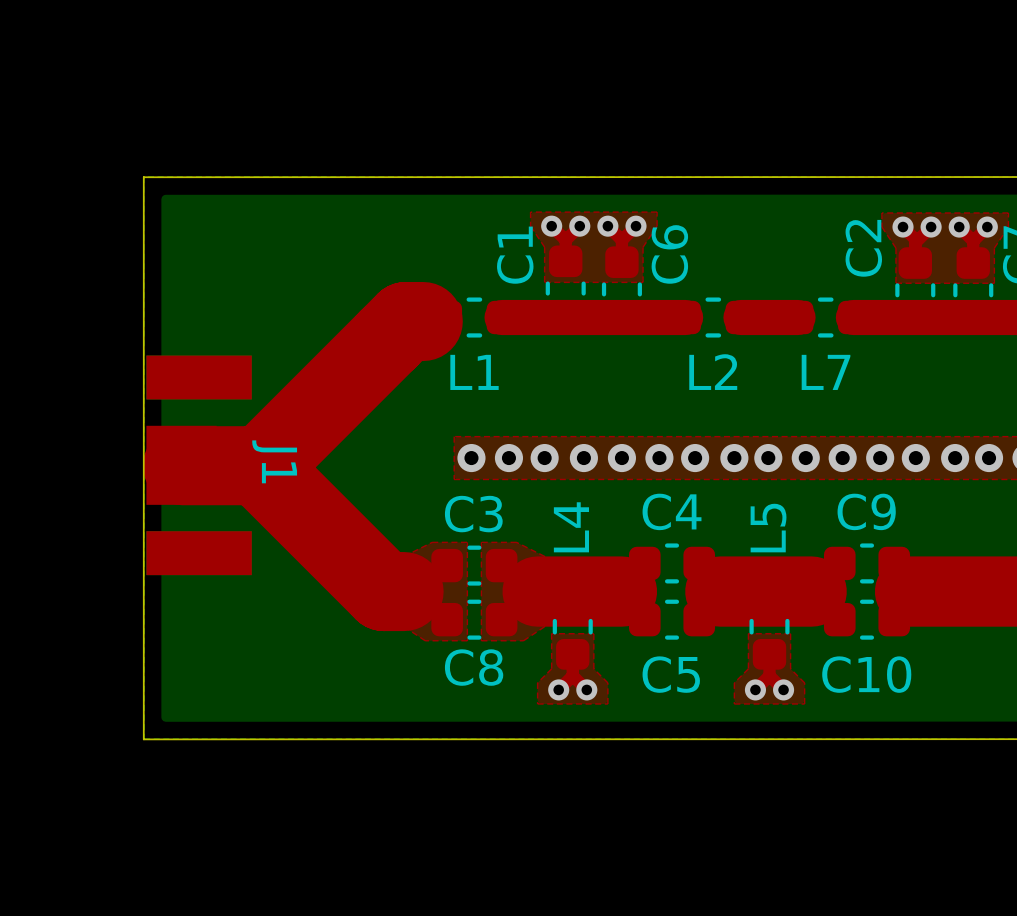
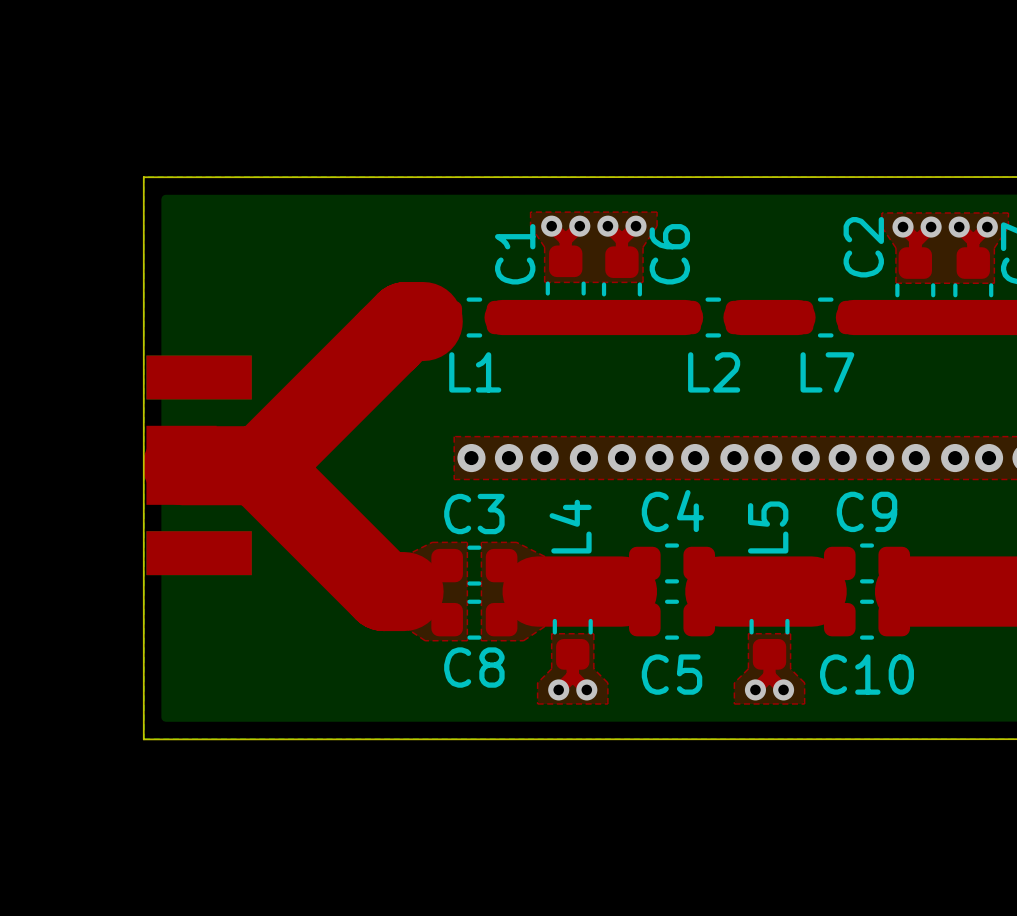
J1 name: J1 (274, 461) -> none

